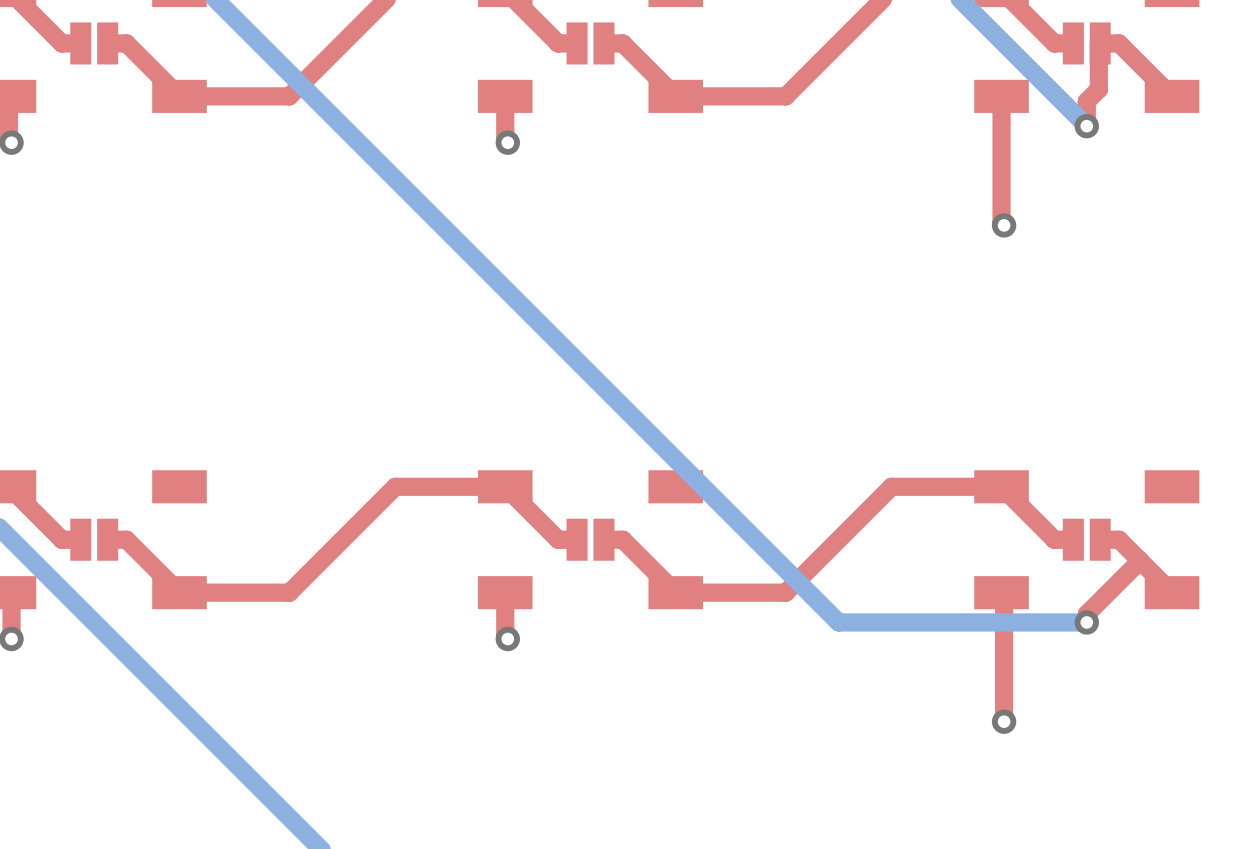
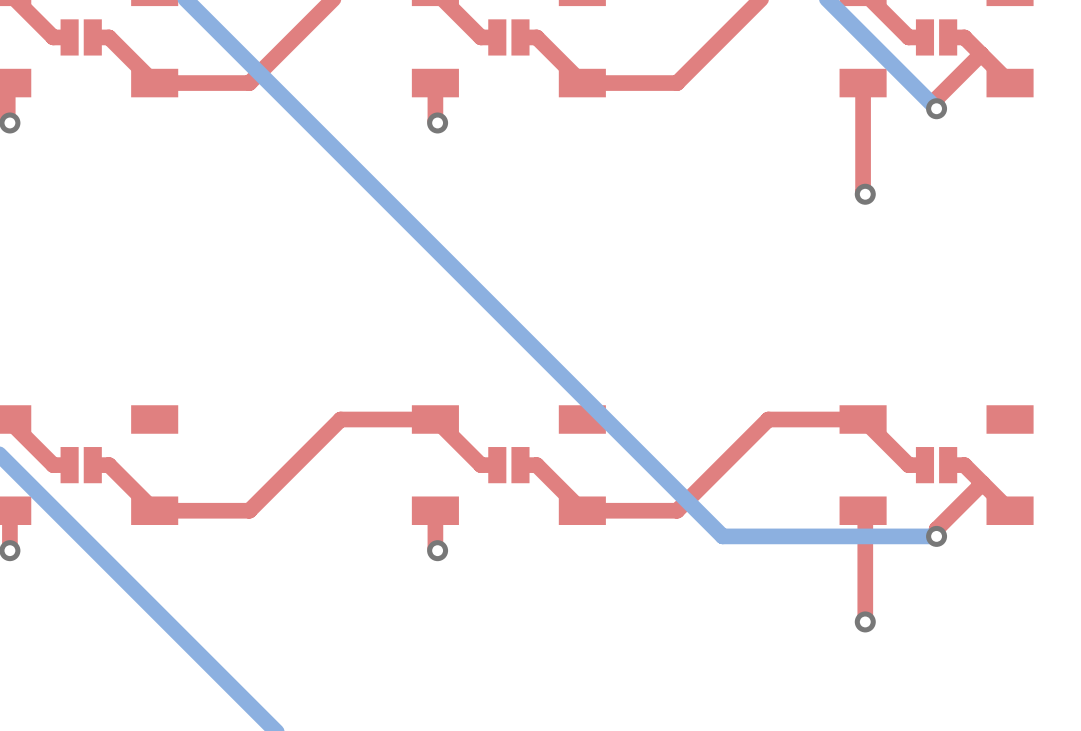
top track: (1100, 43) (1098, 89) (1086, 101) (1086, 114) -> (981, 54) (936, 98)

